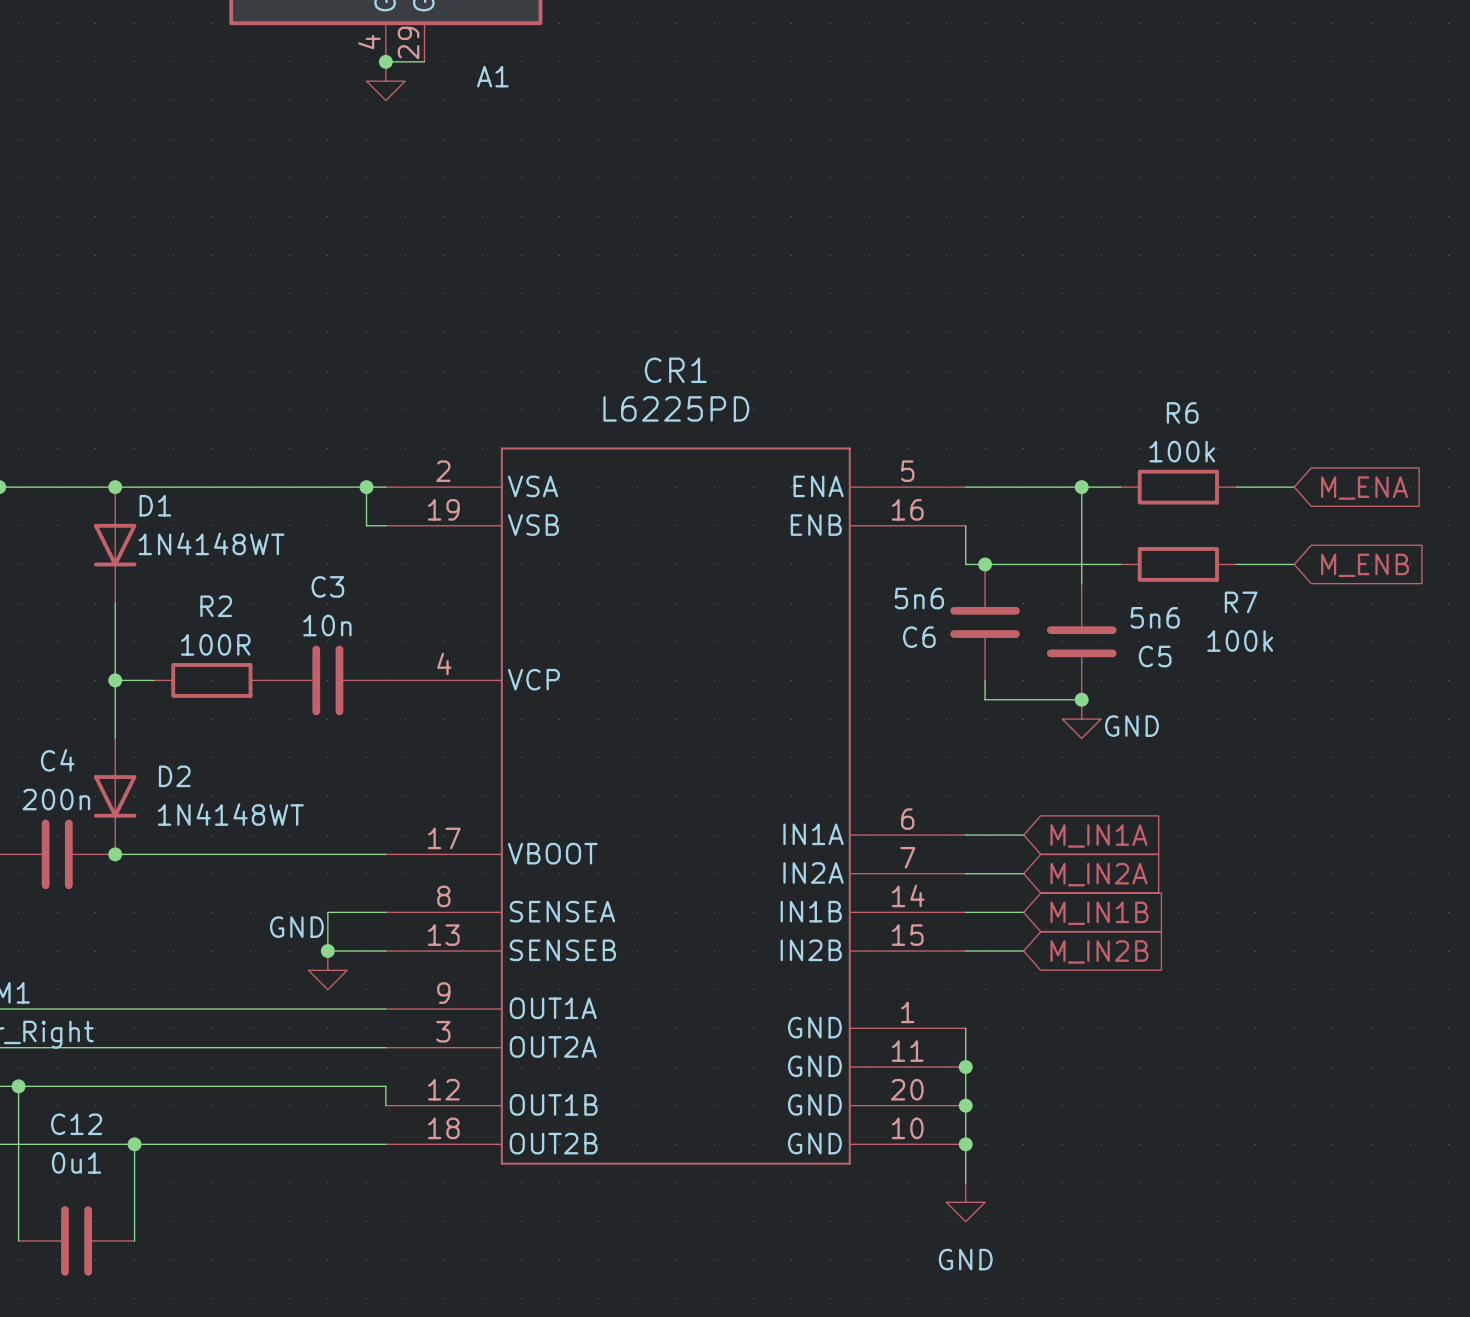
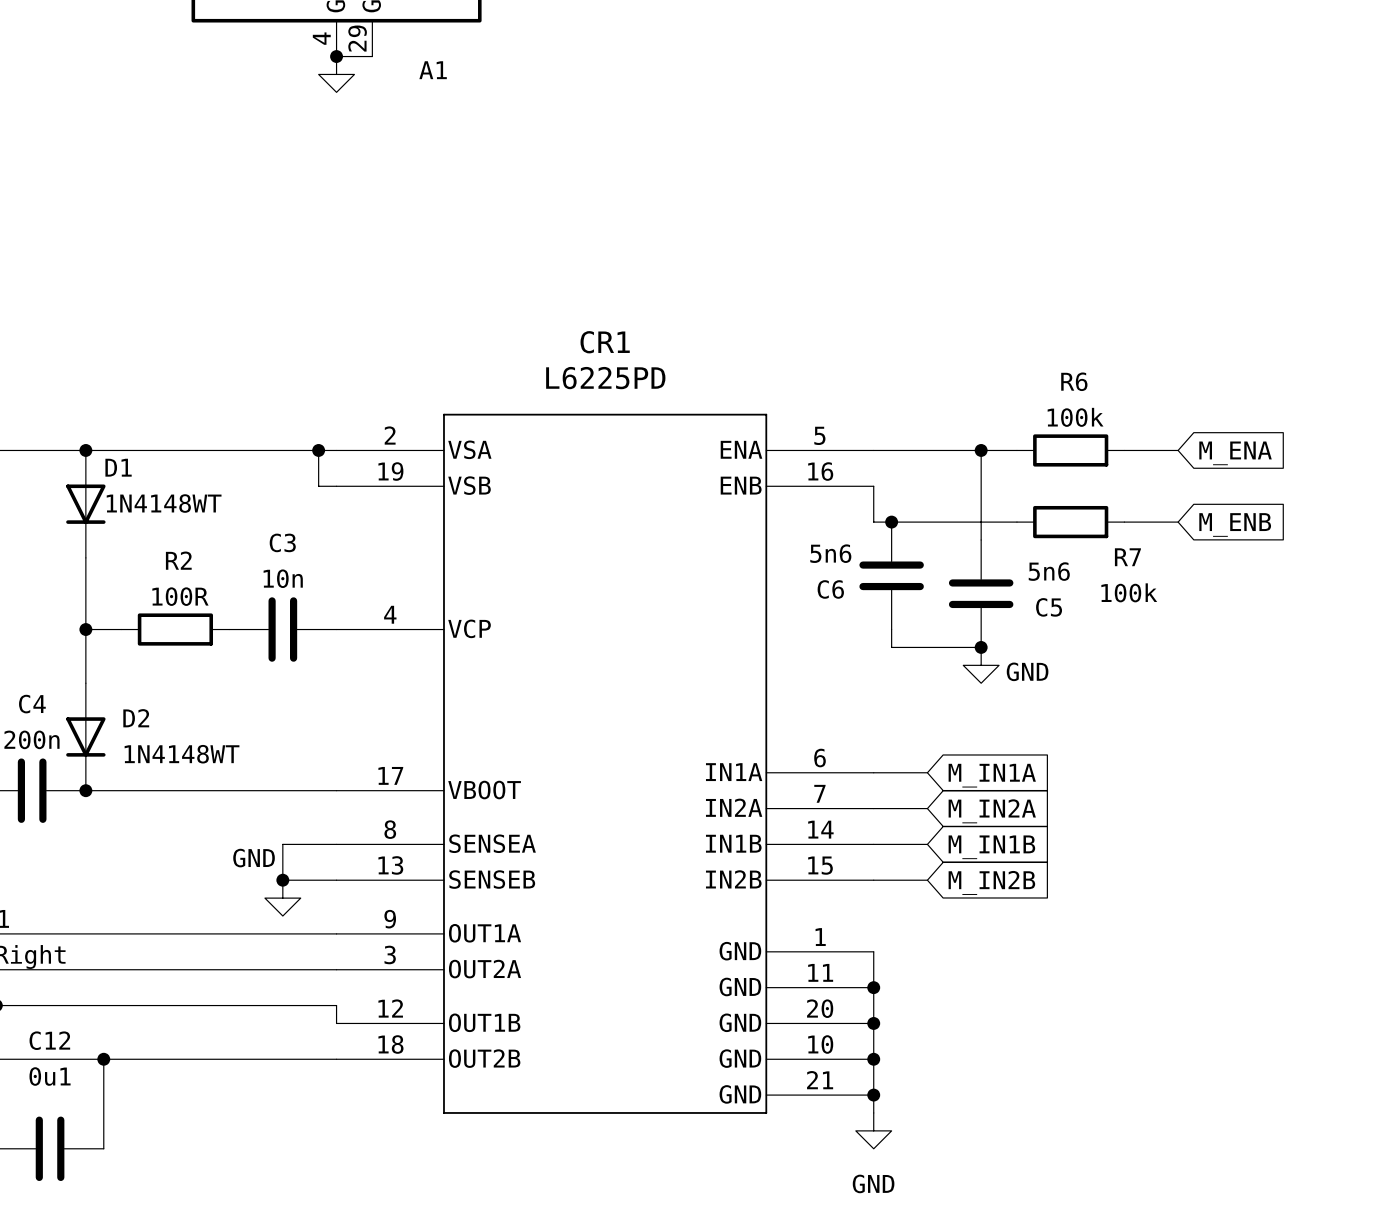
CR1 symbol: [385, 447, 966, 1165] -> [336, 413, 874, 1114]
junction: none -> (873, 1095)
power symbol position: GND (965, 1202) -> GND (873, 1130)

